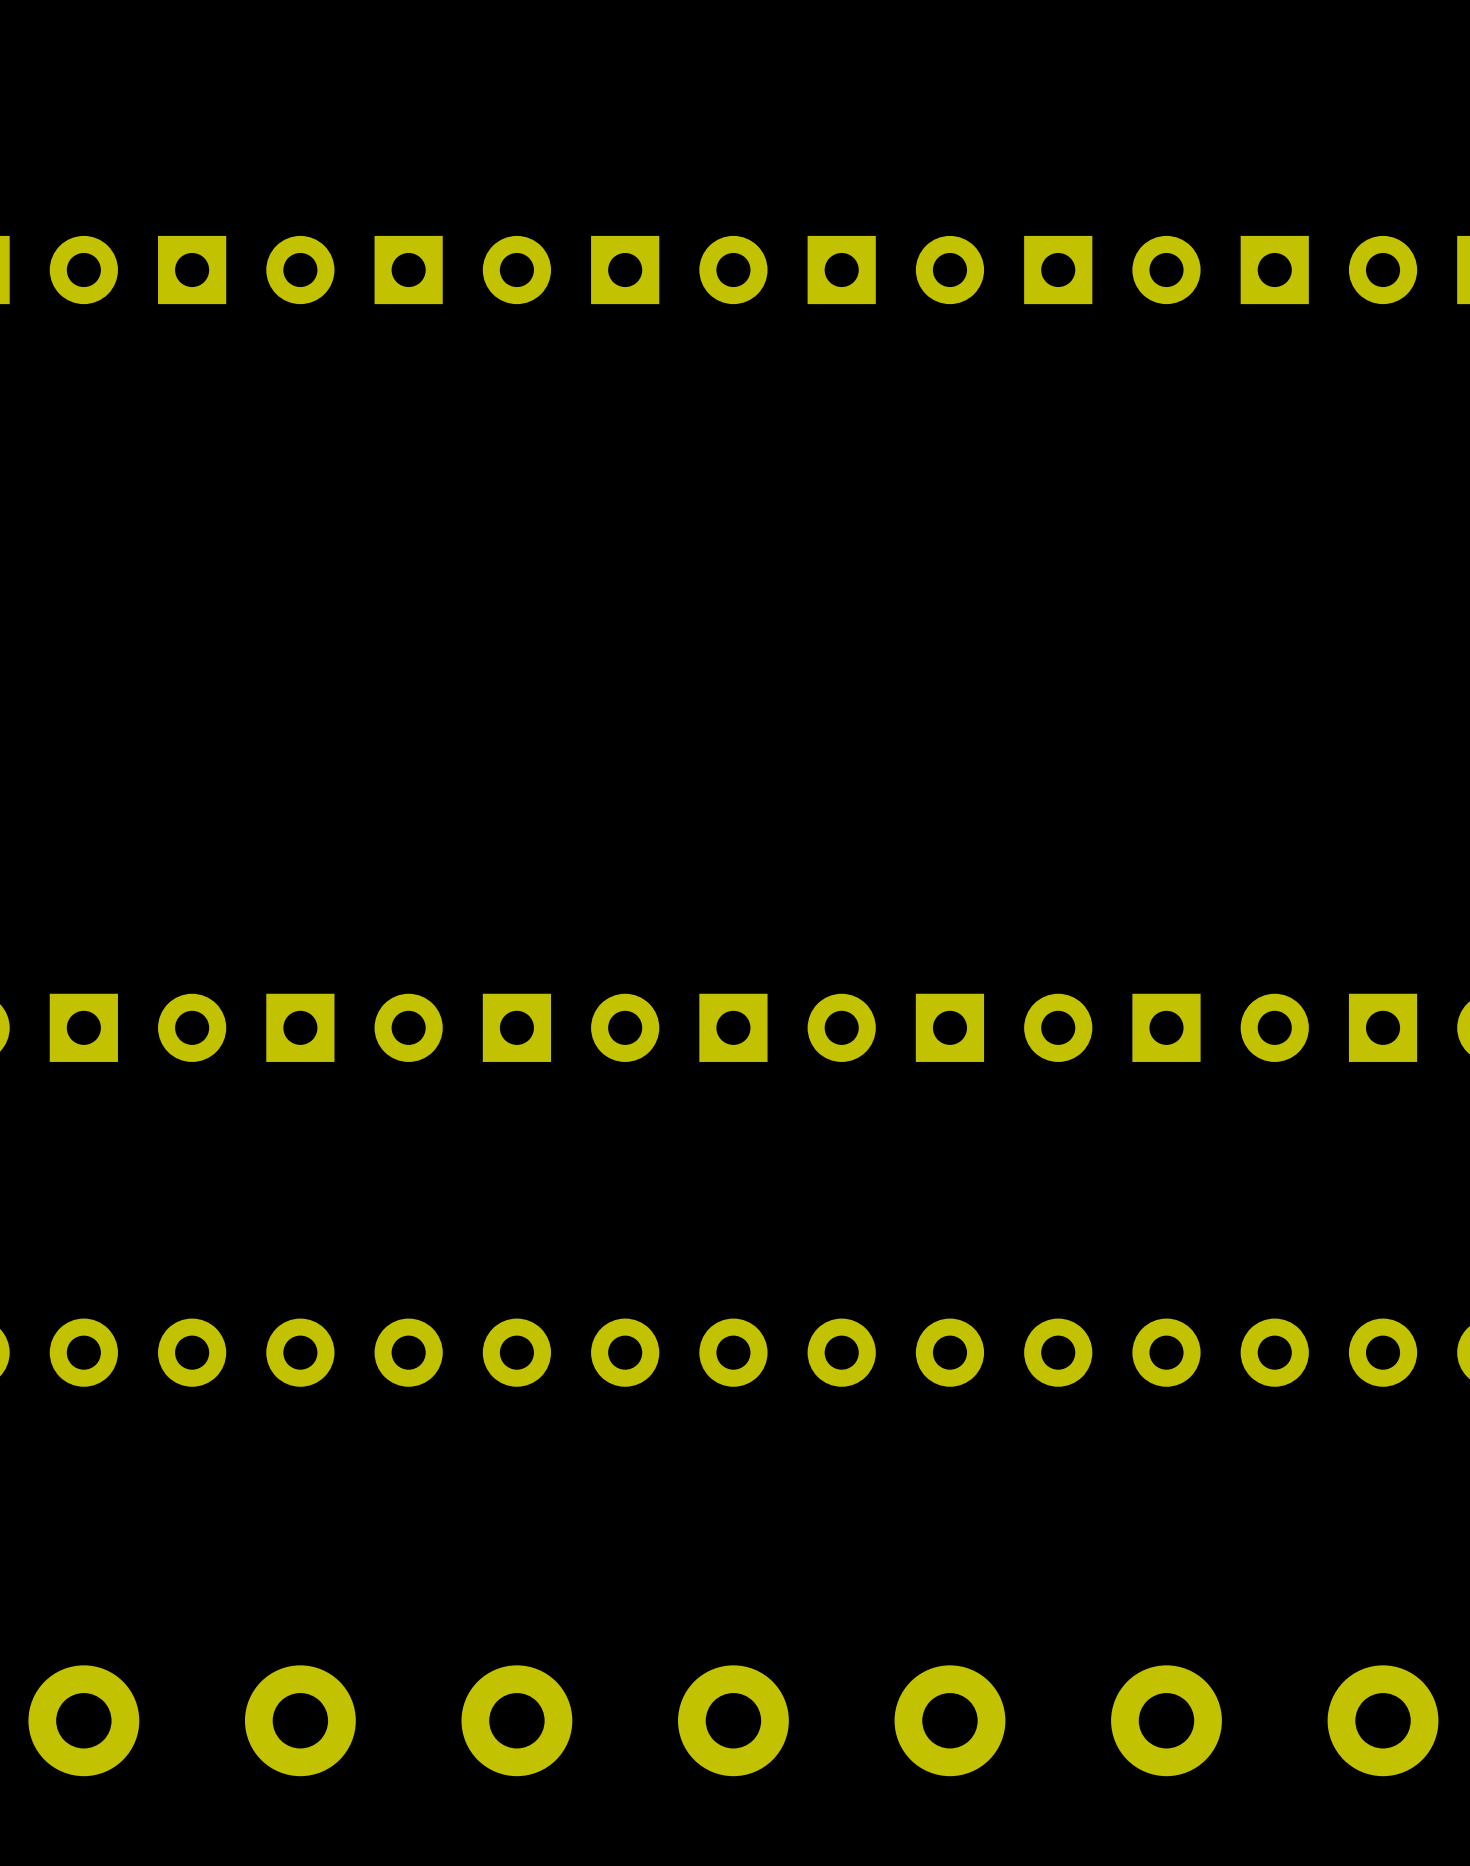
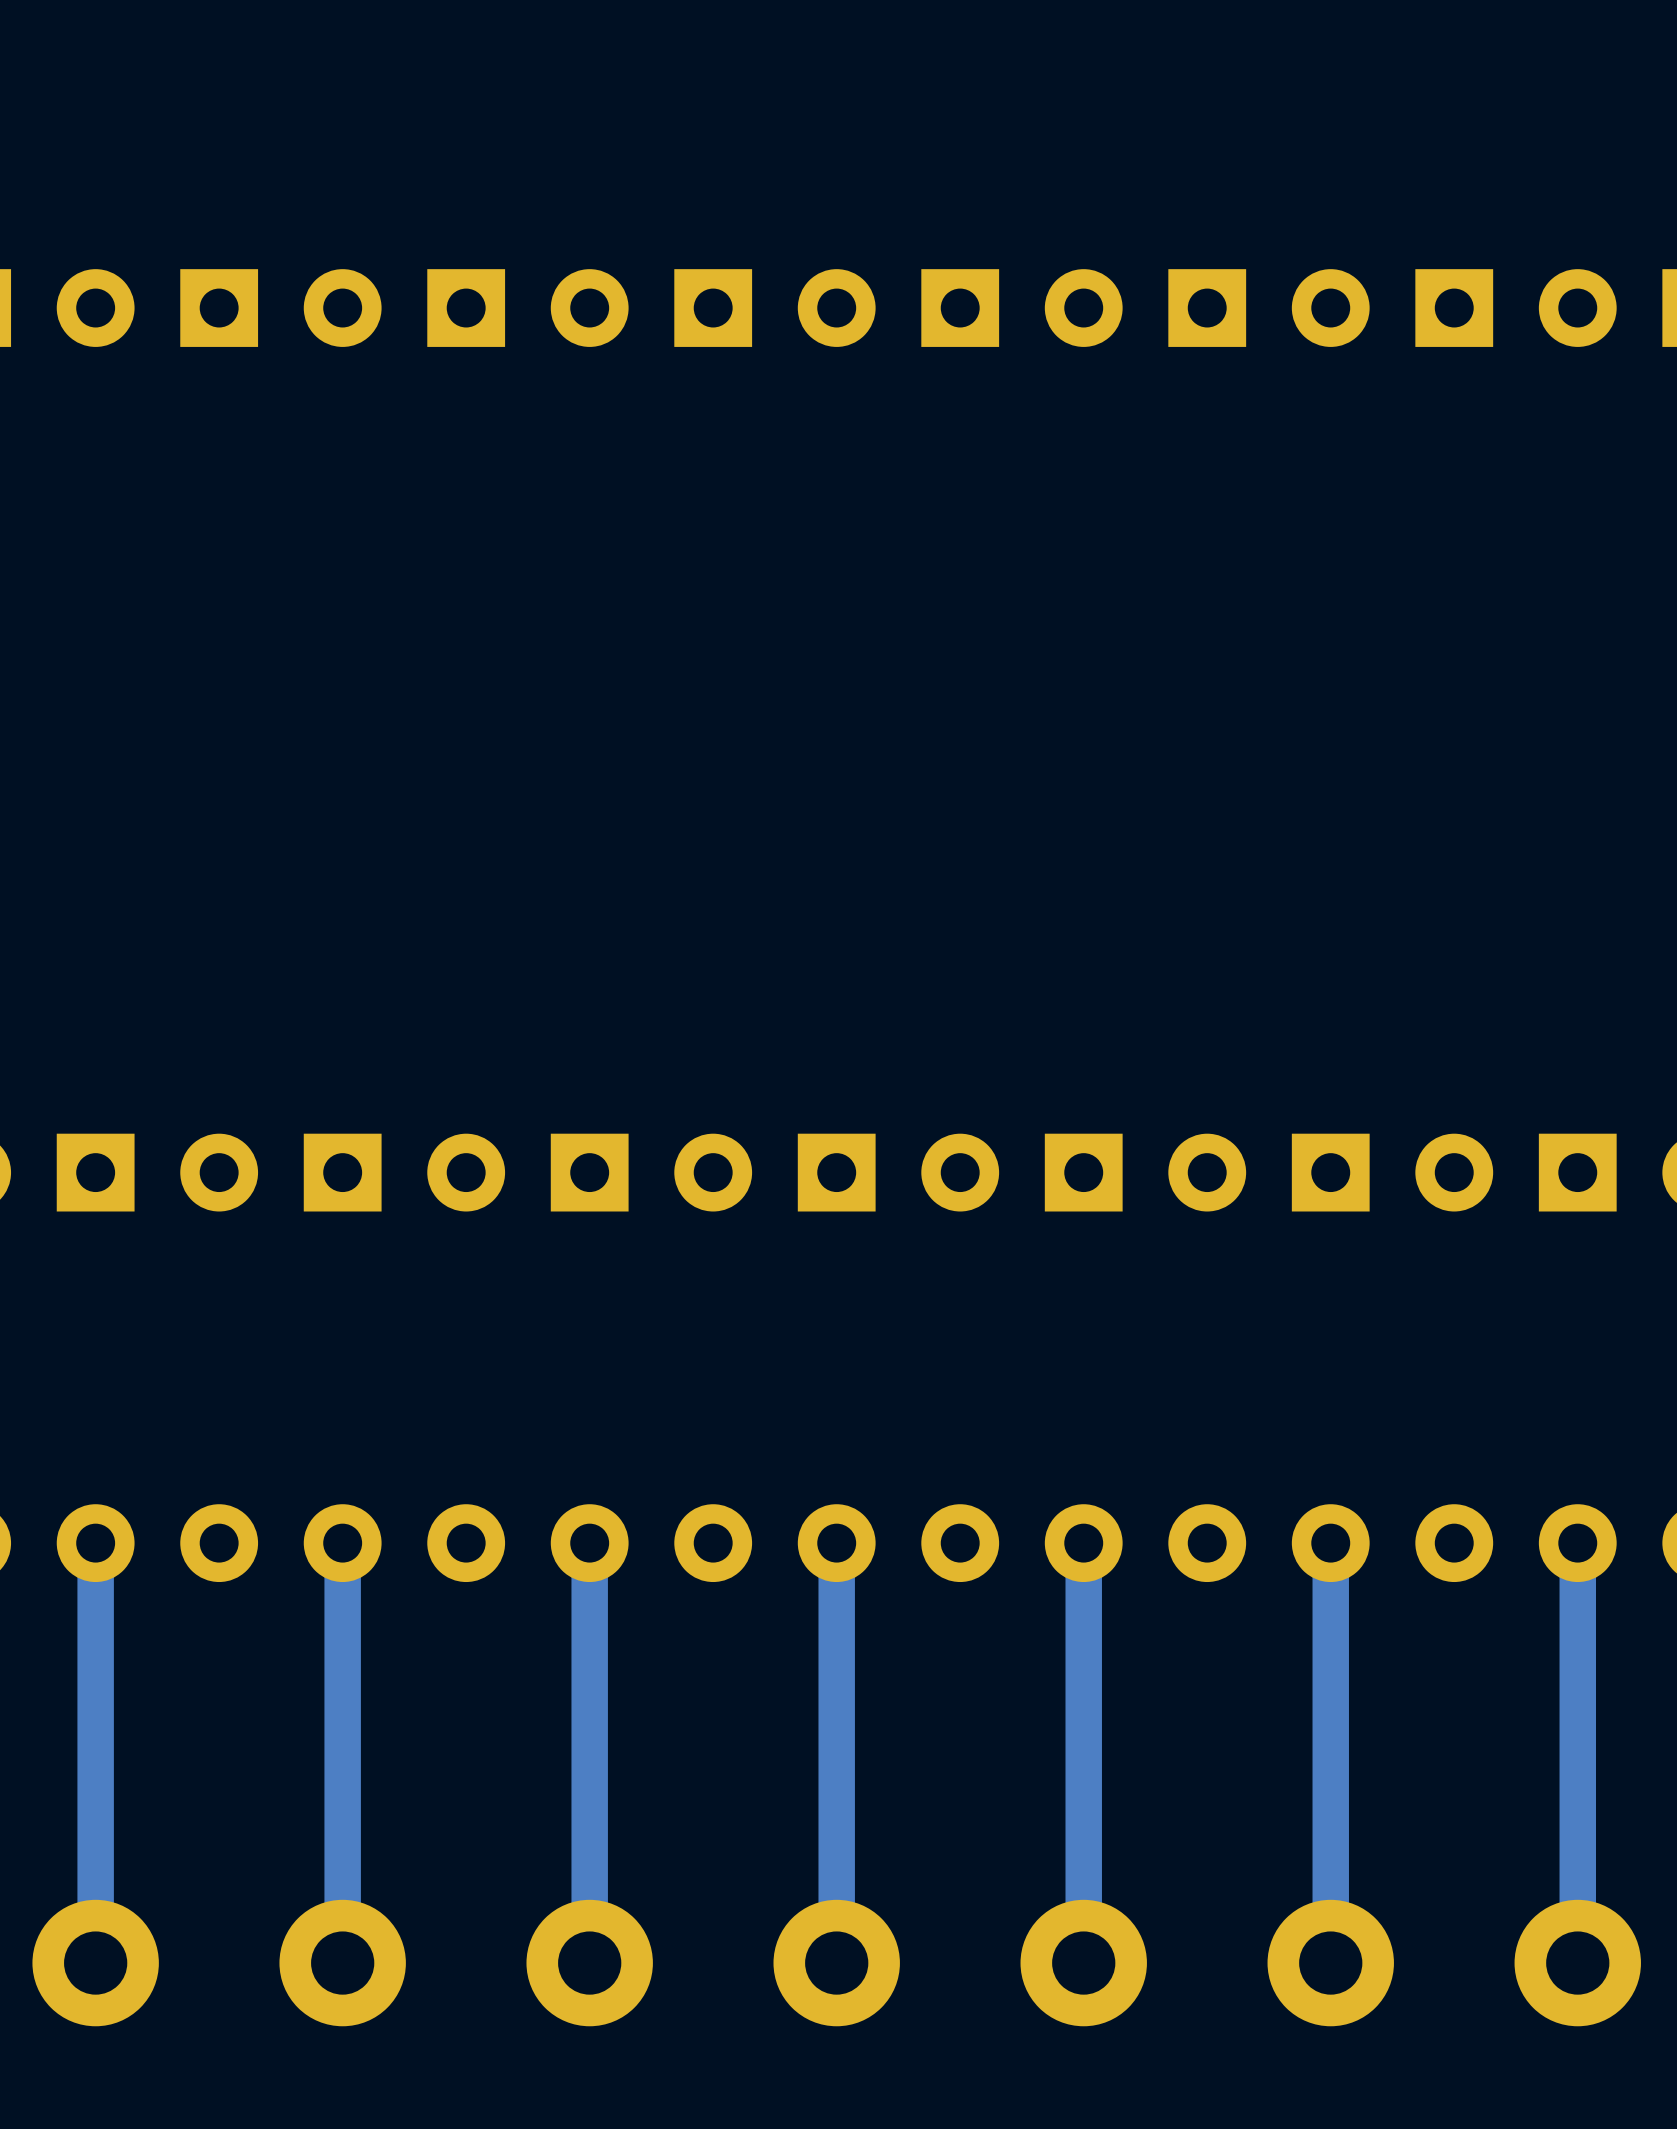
track: none -> (95, 1543) (95, 1963)
track: none -> (342, 1543) (342, 1963)
track: none -> (589, 1543) (589, 1963)
track: none -> (836, 1543) (836, 1963)
track: none -> (1083, 1543) (1083, 1963)
track: none -> (1330, 1543) (1330, 1963)
track: none -> (1577, 1543) (1577, 1963)

